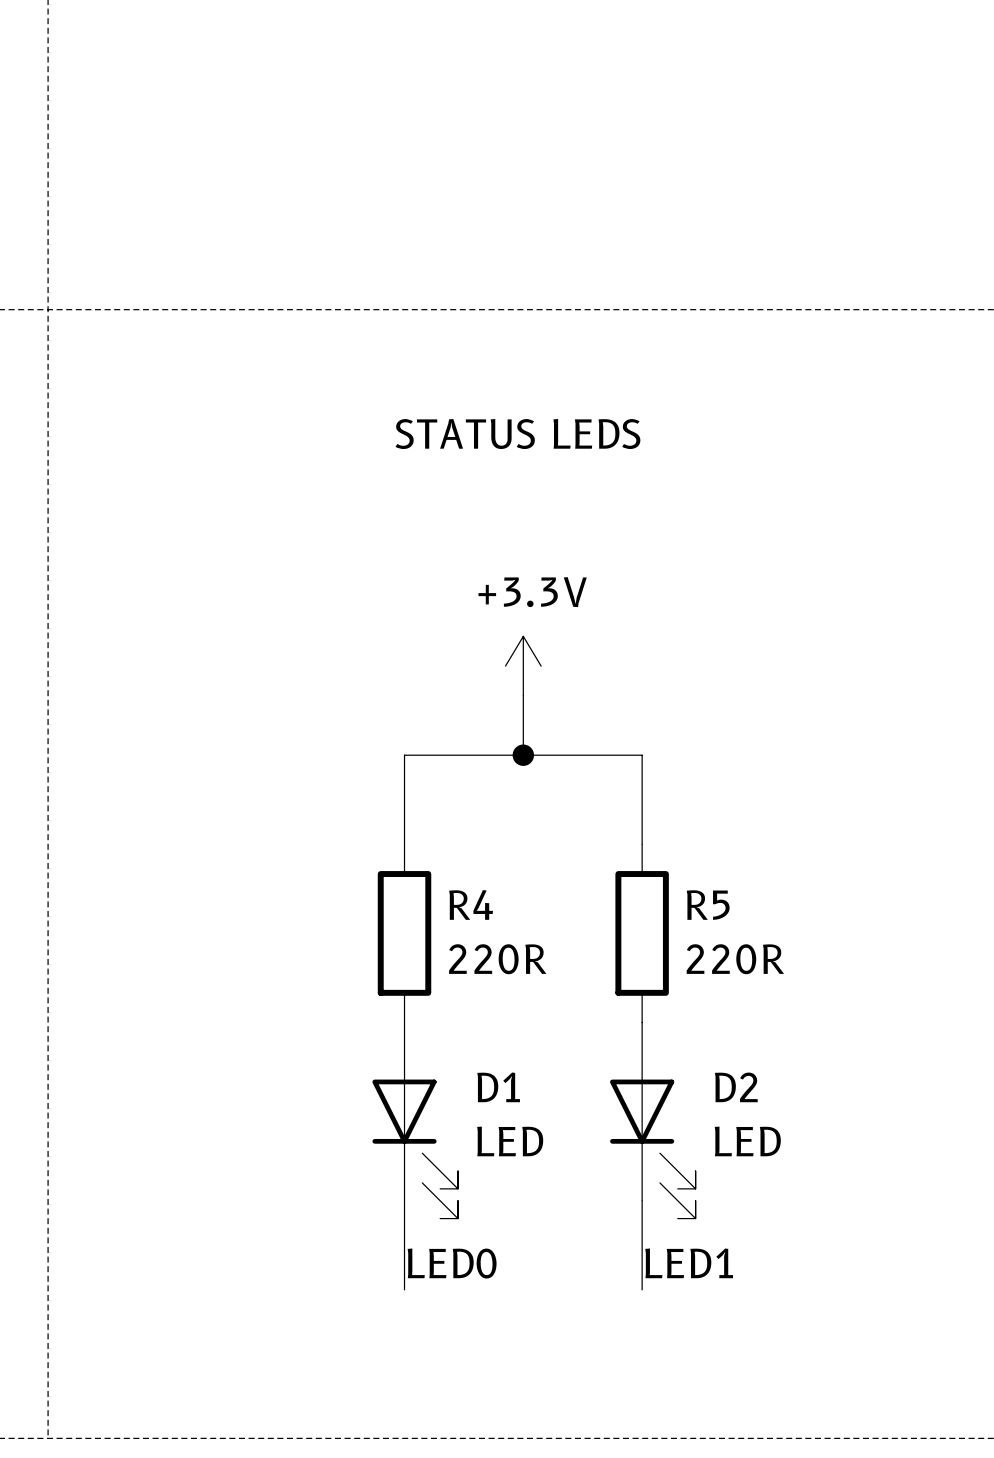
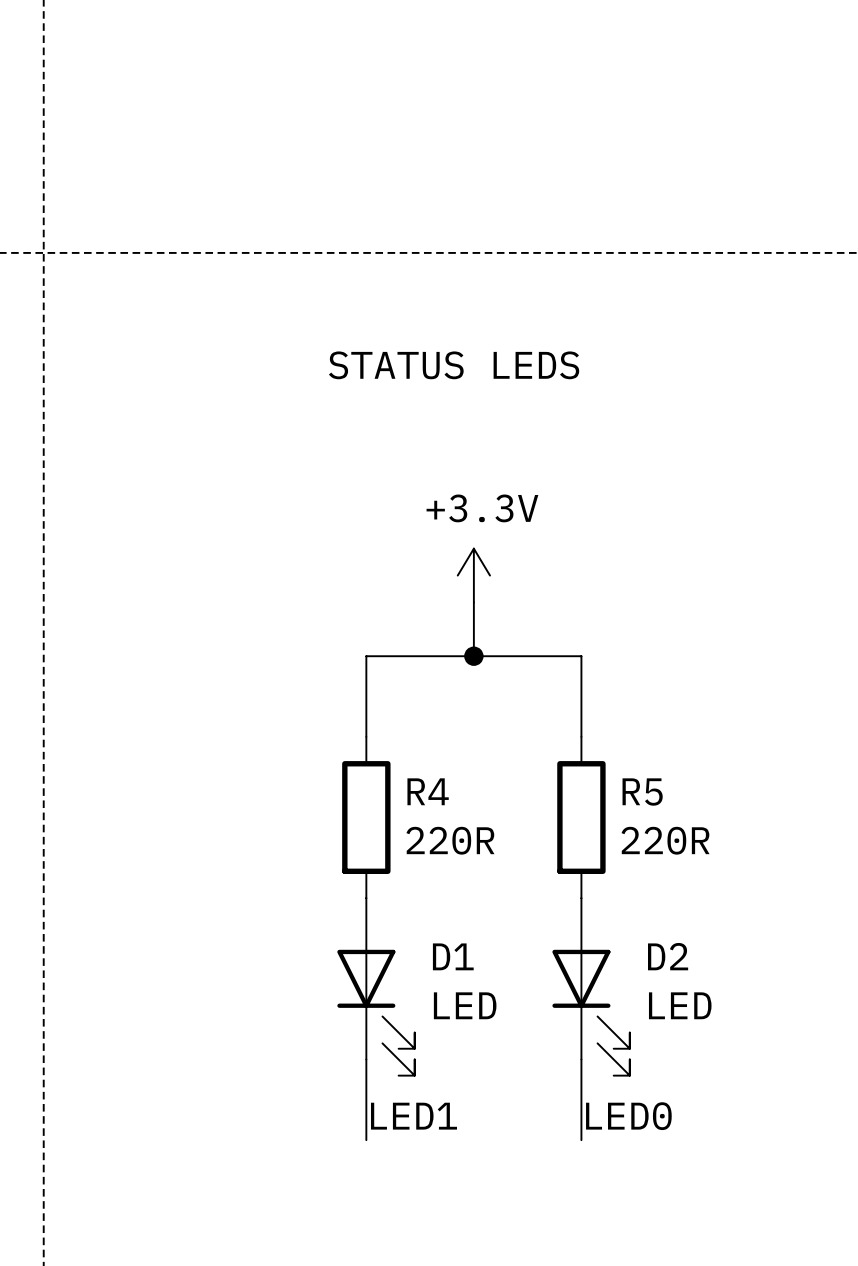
label: LED0 (452, 1263) -> LED1 (413, 1116)
label: LED1 (689, 1263) -> LED0 (628, 1116)

